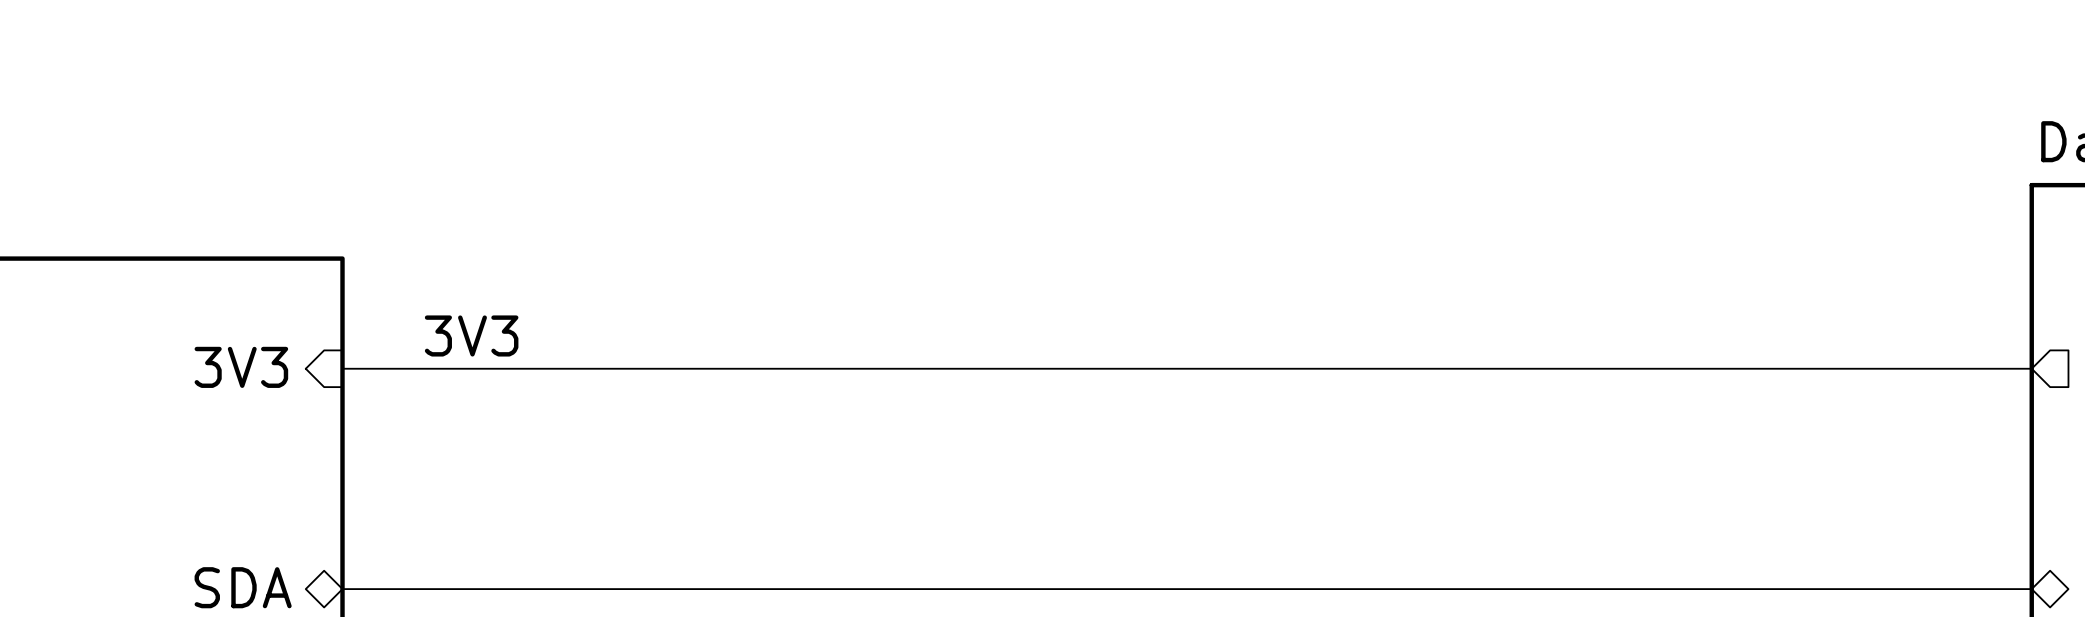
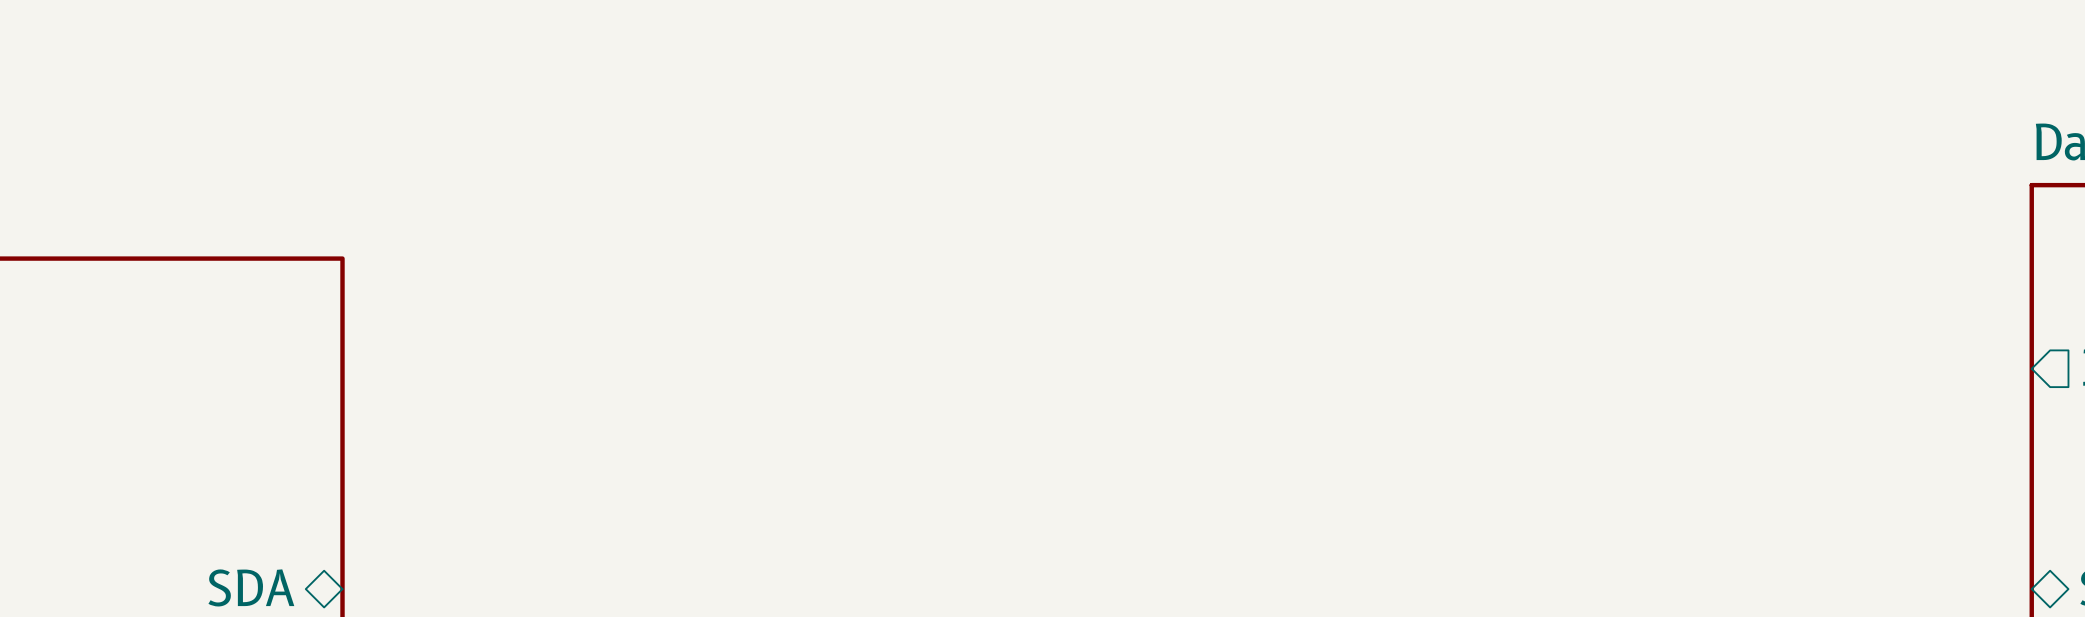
label: 3V3 (471, 335) -> none
sheet pin: 3V3 (241, 367) -> none
wire: (342, 368) (2031, 368) -> none
wire: (342, 589) (2031, 589) -> none

